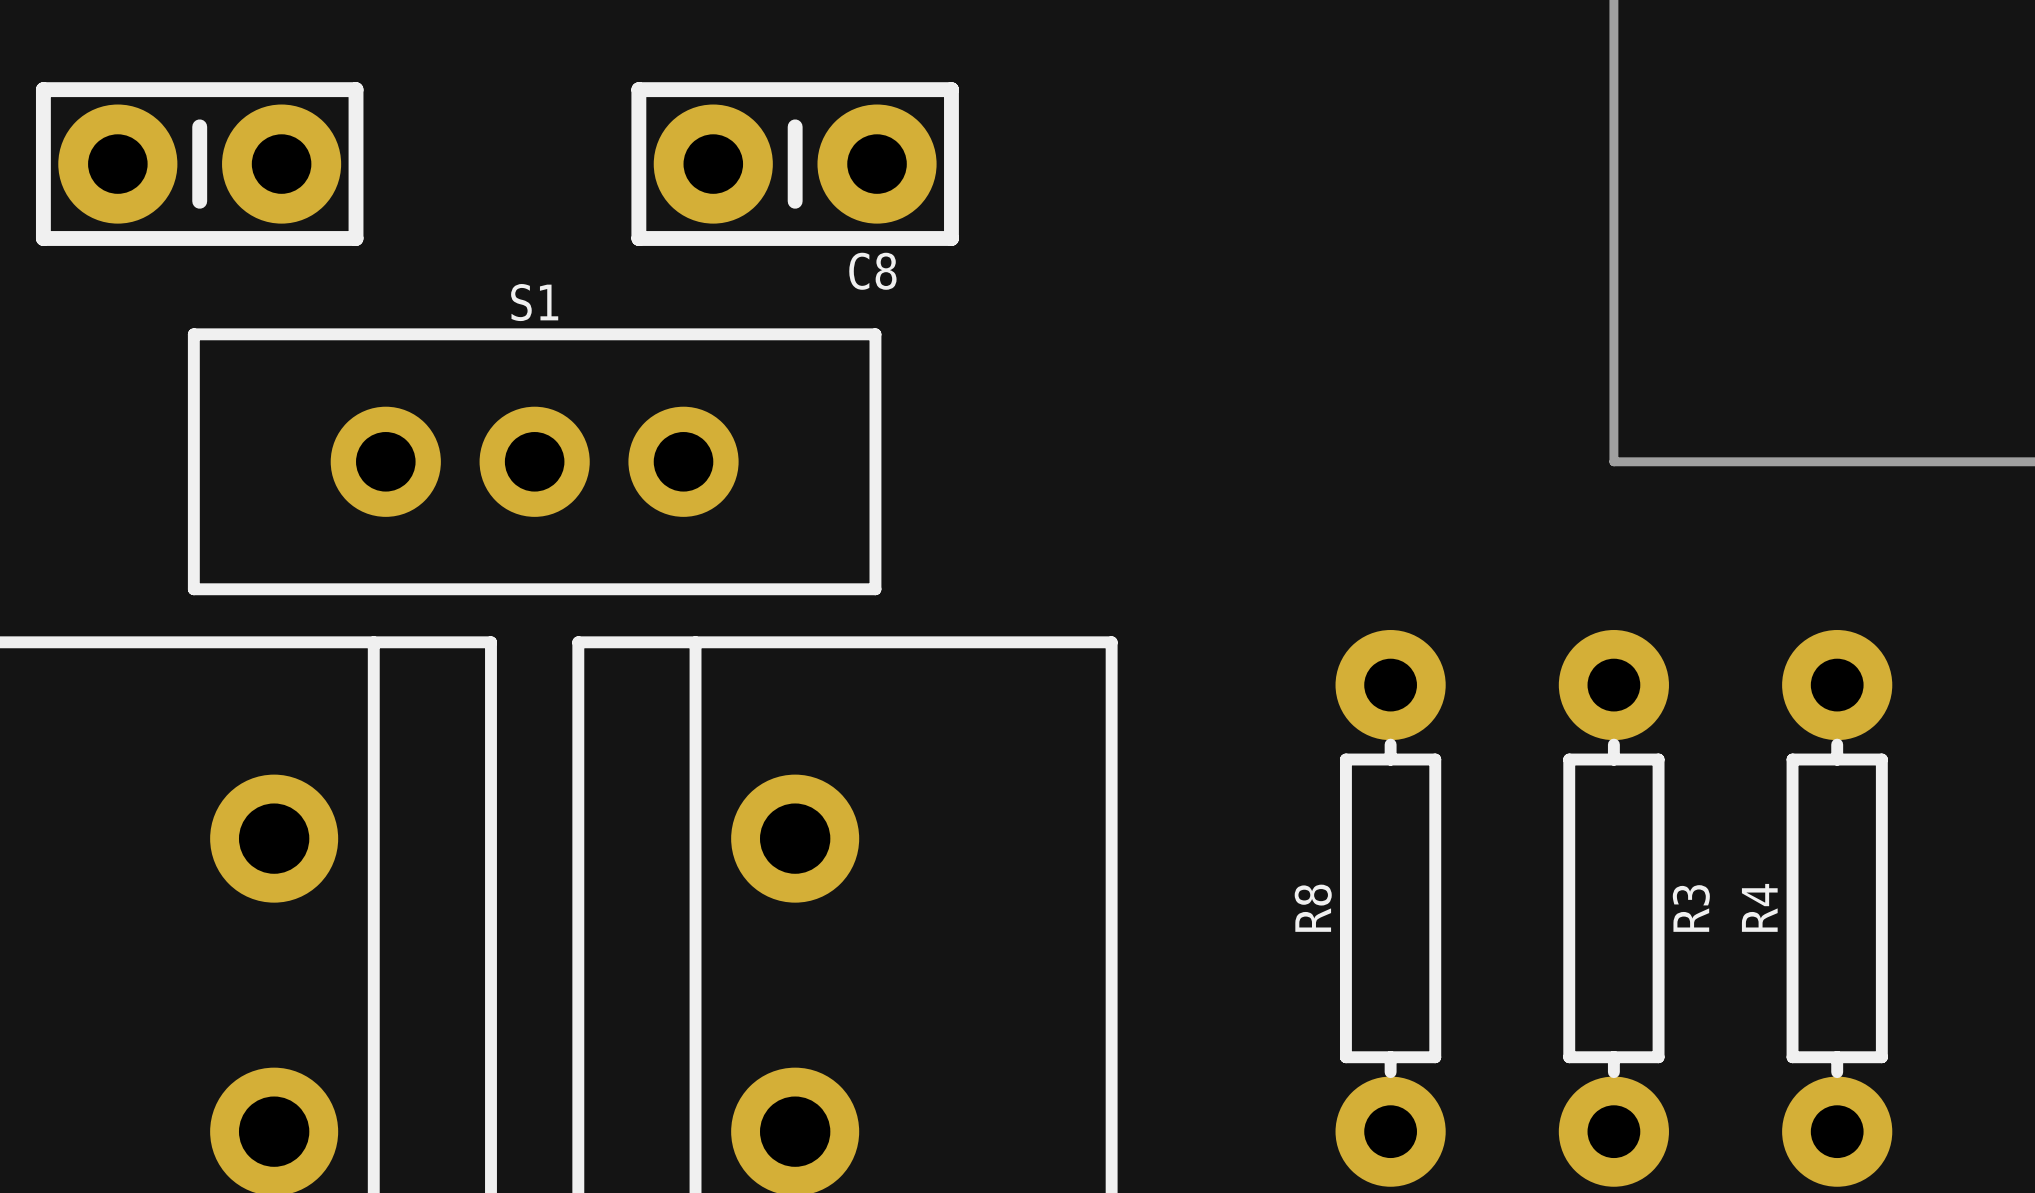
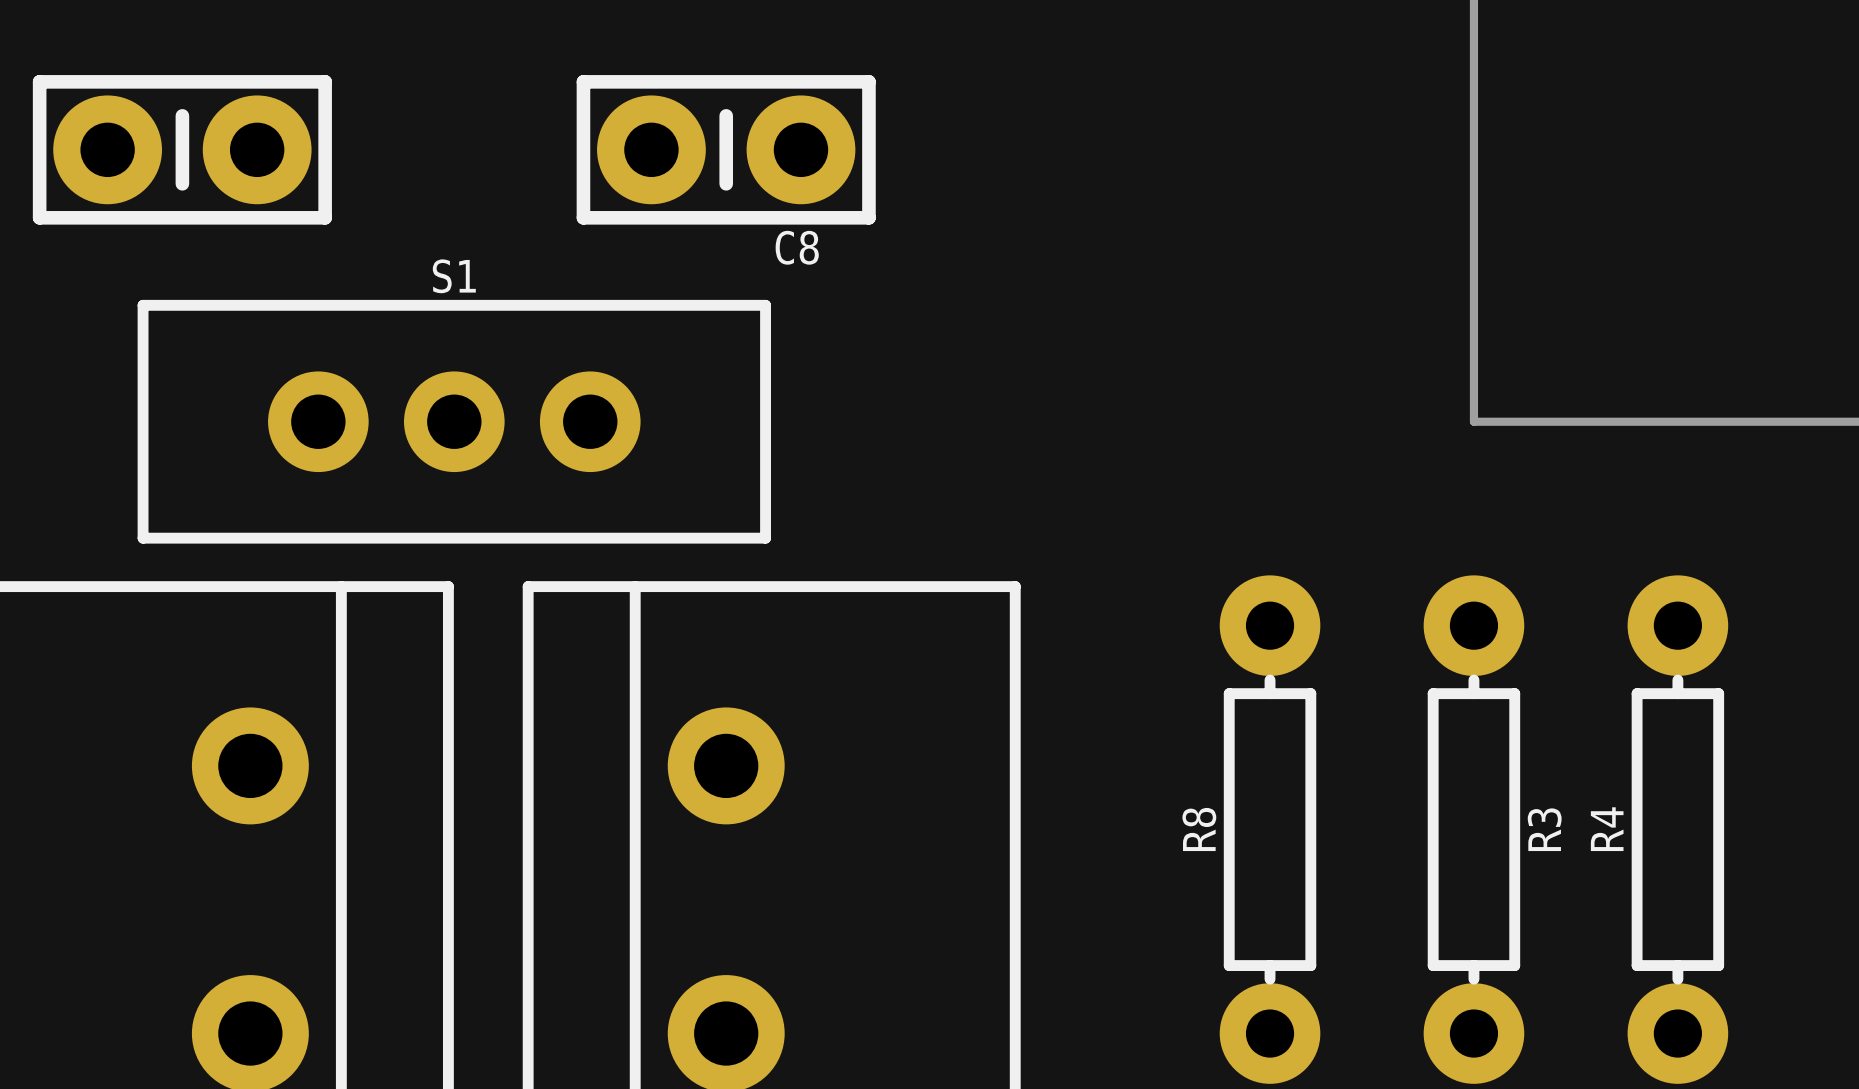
S1 position: (534, 461) -> (454, 421)

